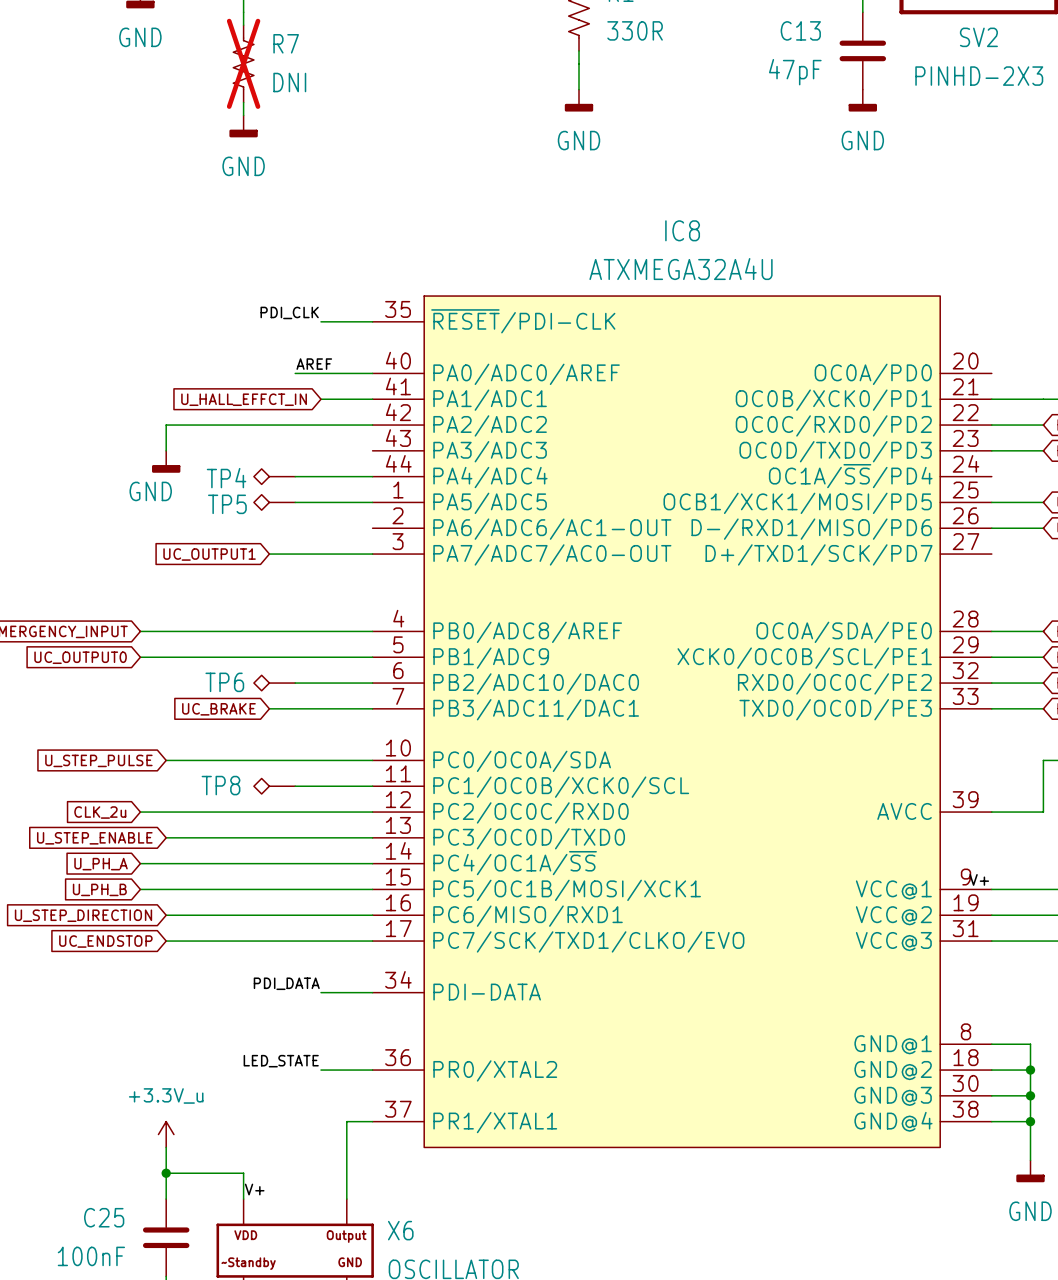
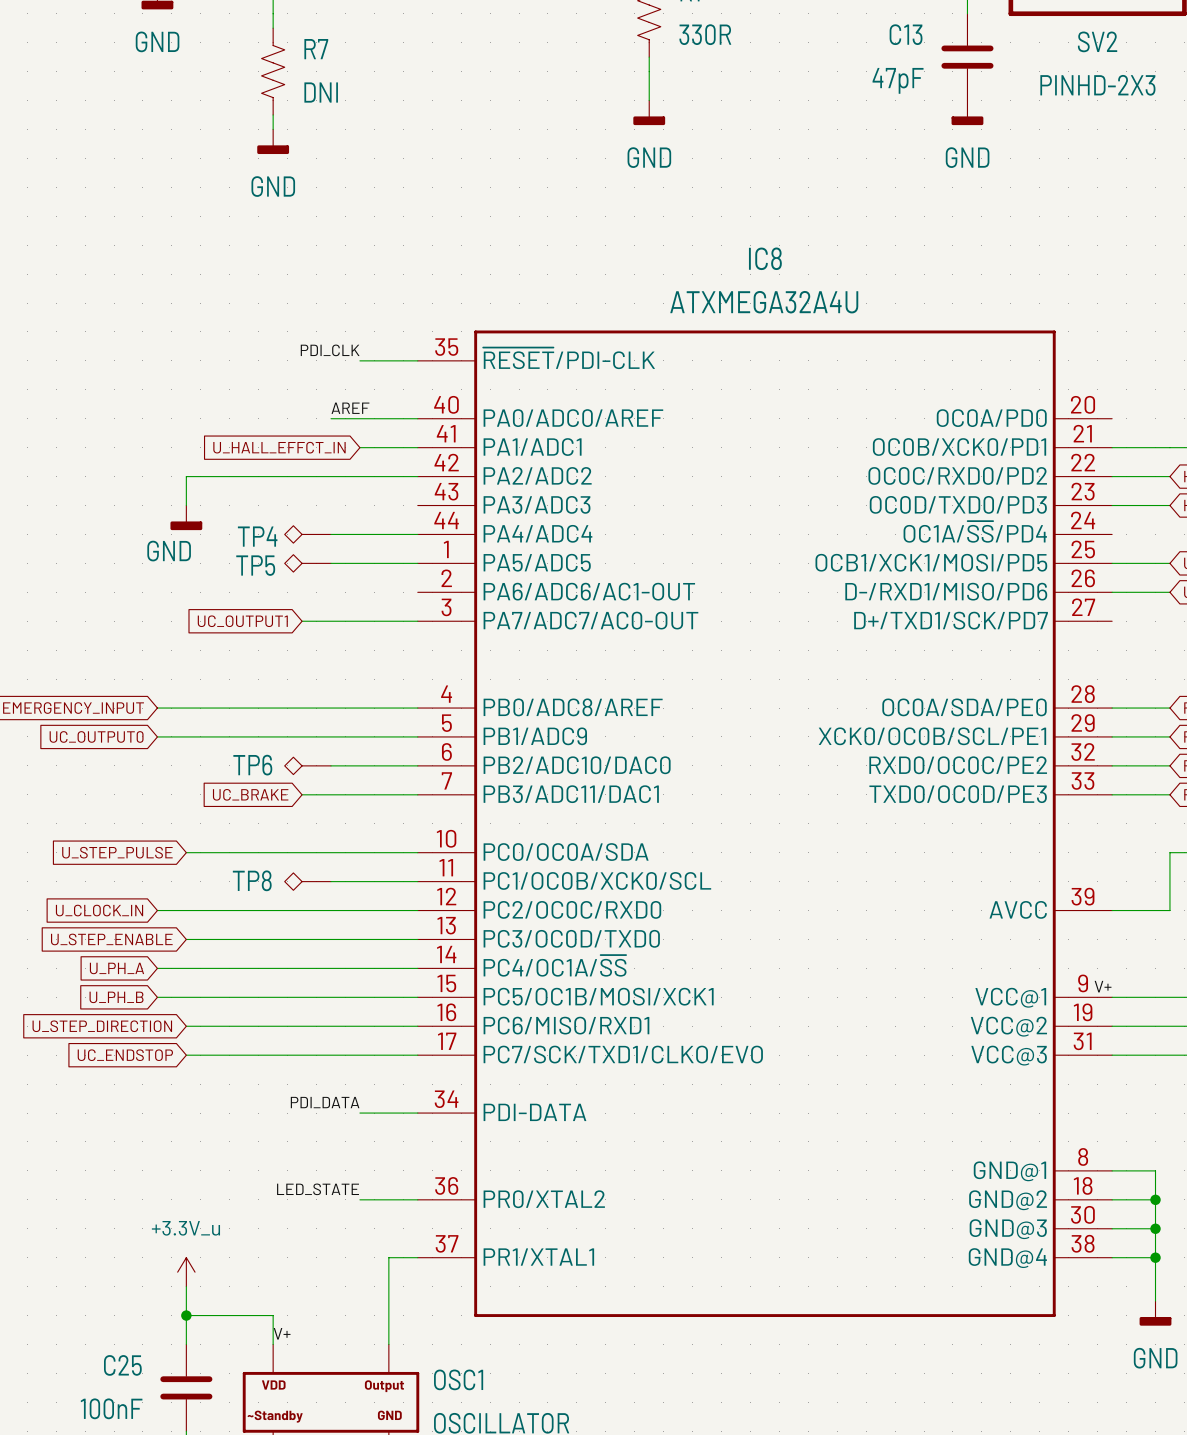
R7 do-not-place cross: (243, 63) -> none
IC8 symbol: [372, 296, 992, 1148] -> [417, 330, 1113, 1318]
global label: CLK_2u (100, 812) -> U_CLOCK_IN (99, 910)
X6 name: X6 (400, 1230) -> OSC1 (458, 1379)

